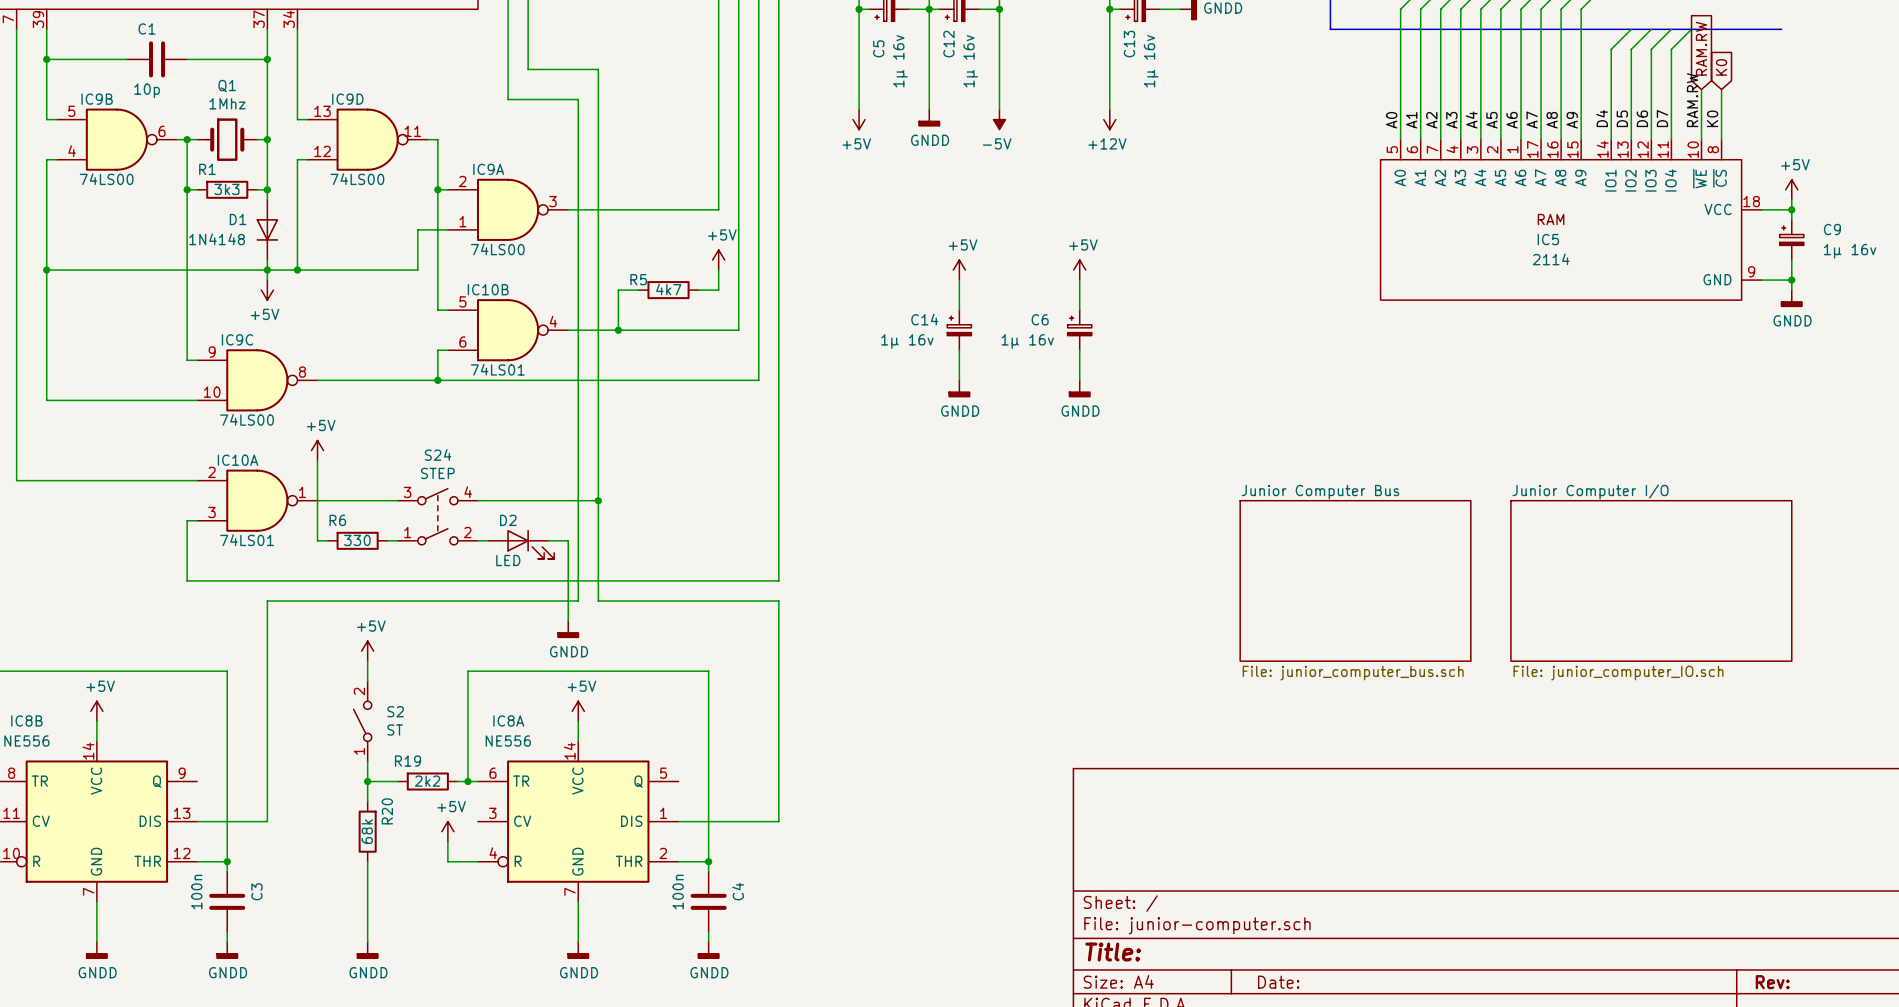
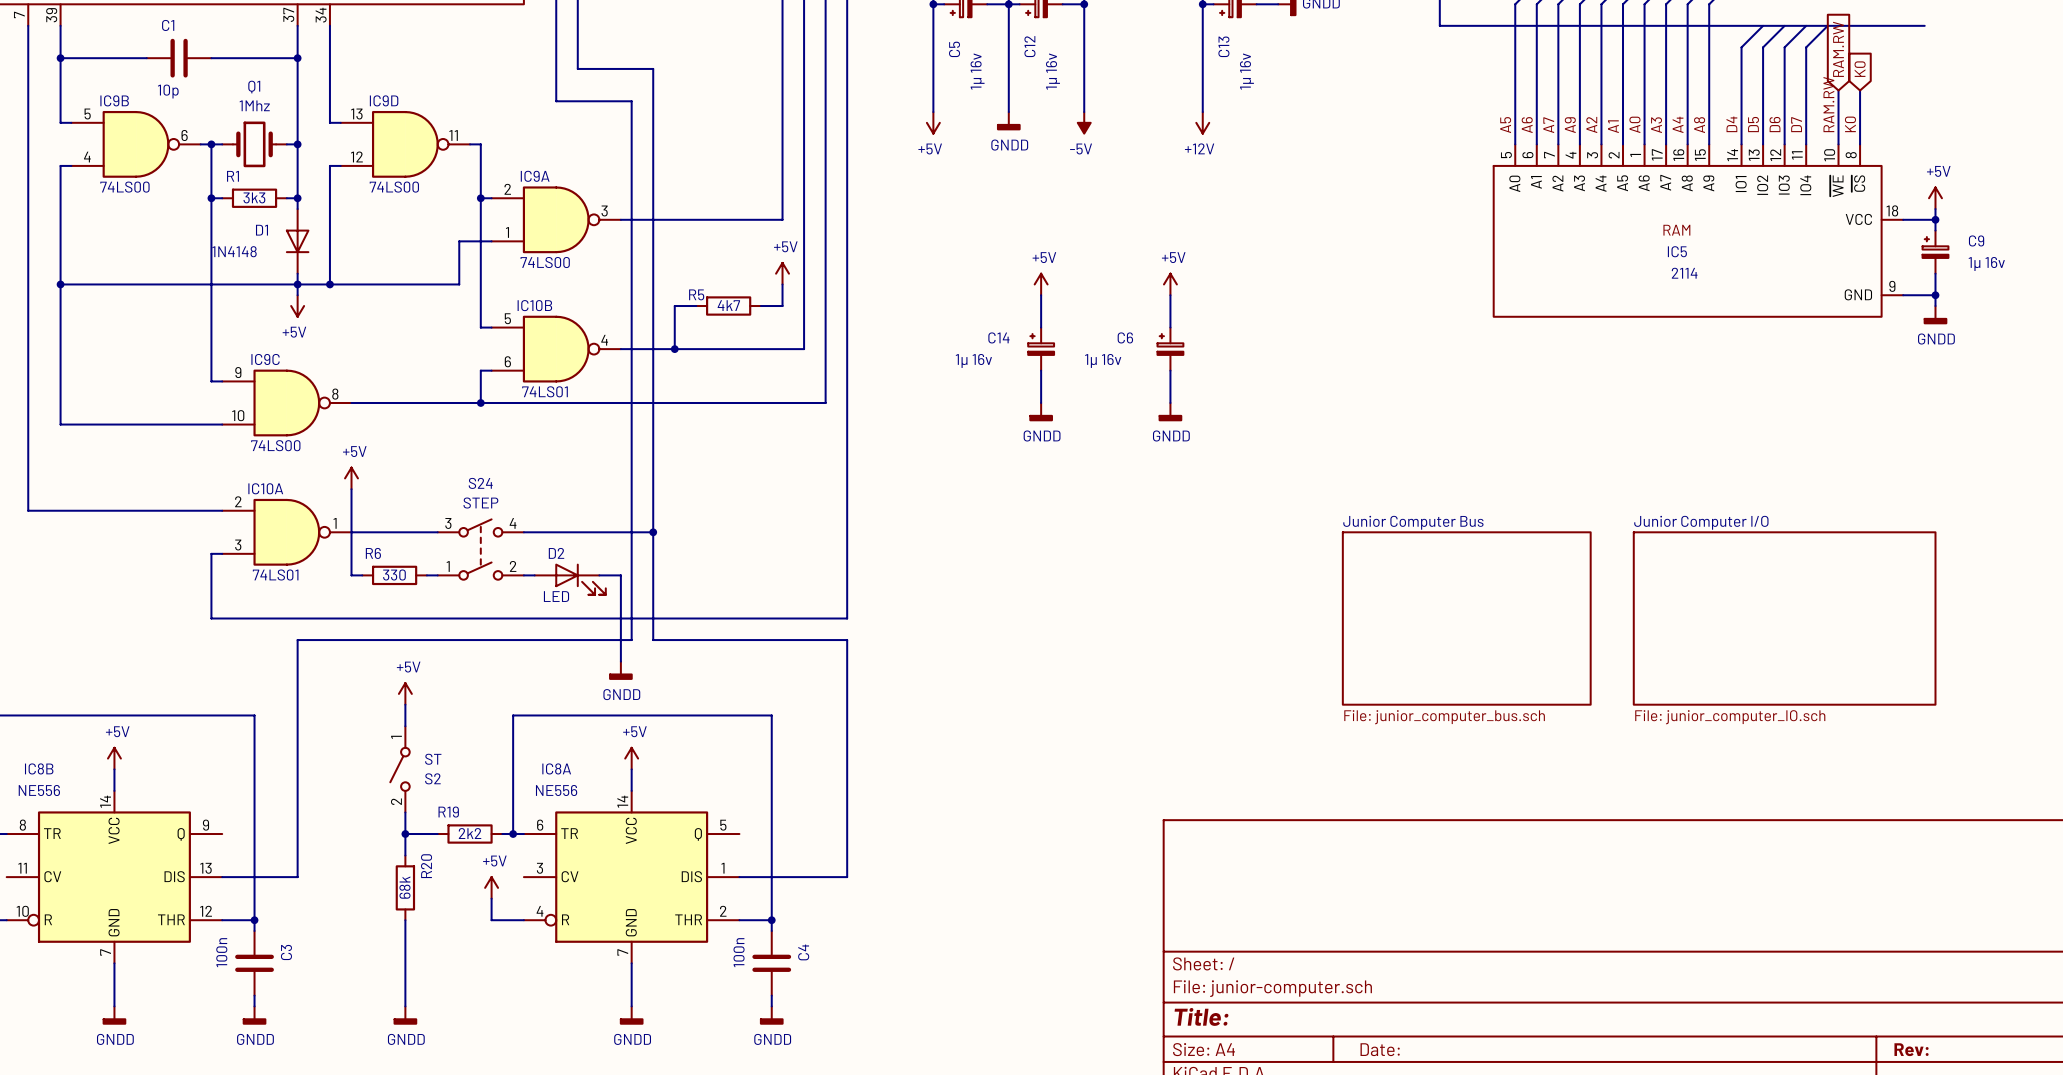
label: A0 (1391, 120) -> A5 (1505, 125)
label: A1 (1411, 120) -> A6 (1527, 125)
label: A2 (1431, 120) -> A7 (1548, 125)
label: A3 (1451, 120) -> A9 (1570, 125)
label: A4 (1471, 120) -> A2 (1591, 125)
label: A5 (1491, 120) -> A1 (1613, 126)
label: A6 (1512, 120) -> A0 (1634, 124)
label: A7 (1532, 120) -> A3 (1656, 125)
label: A8 (1552, 120) -> A4 (1678, 124)
label: A9 (1572, 120) -> A8 (1699, 125)
S2 flip: as is (362, 721) -> up-down (400, 769)

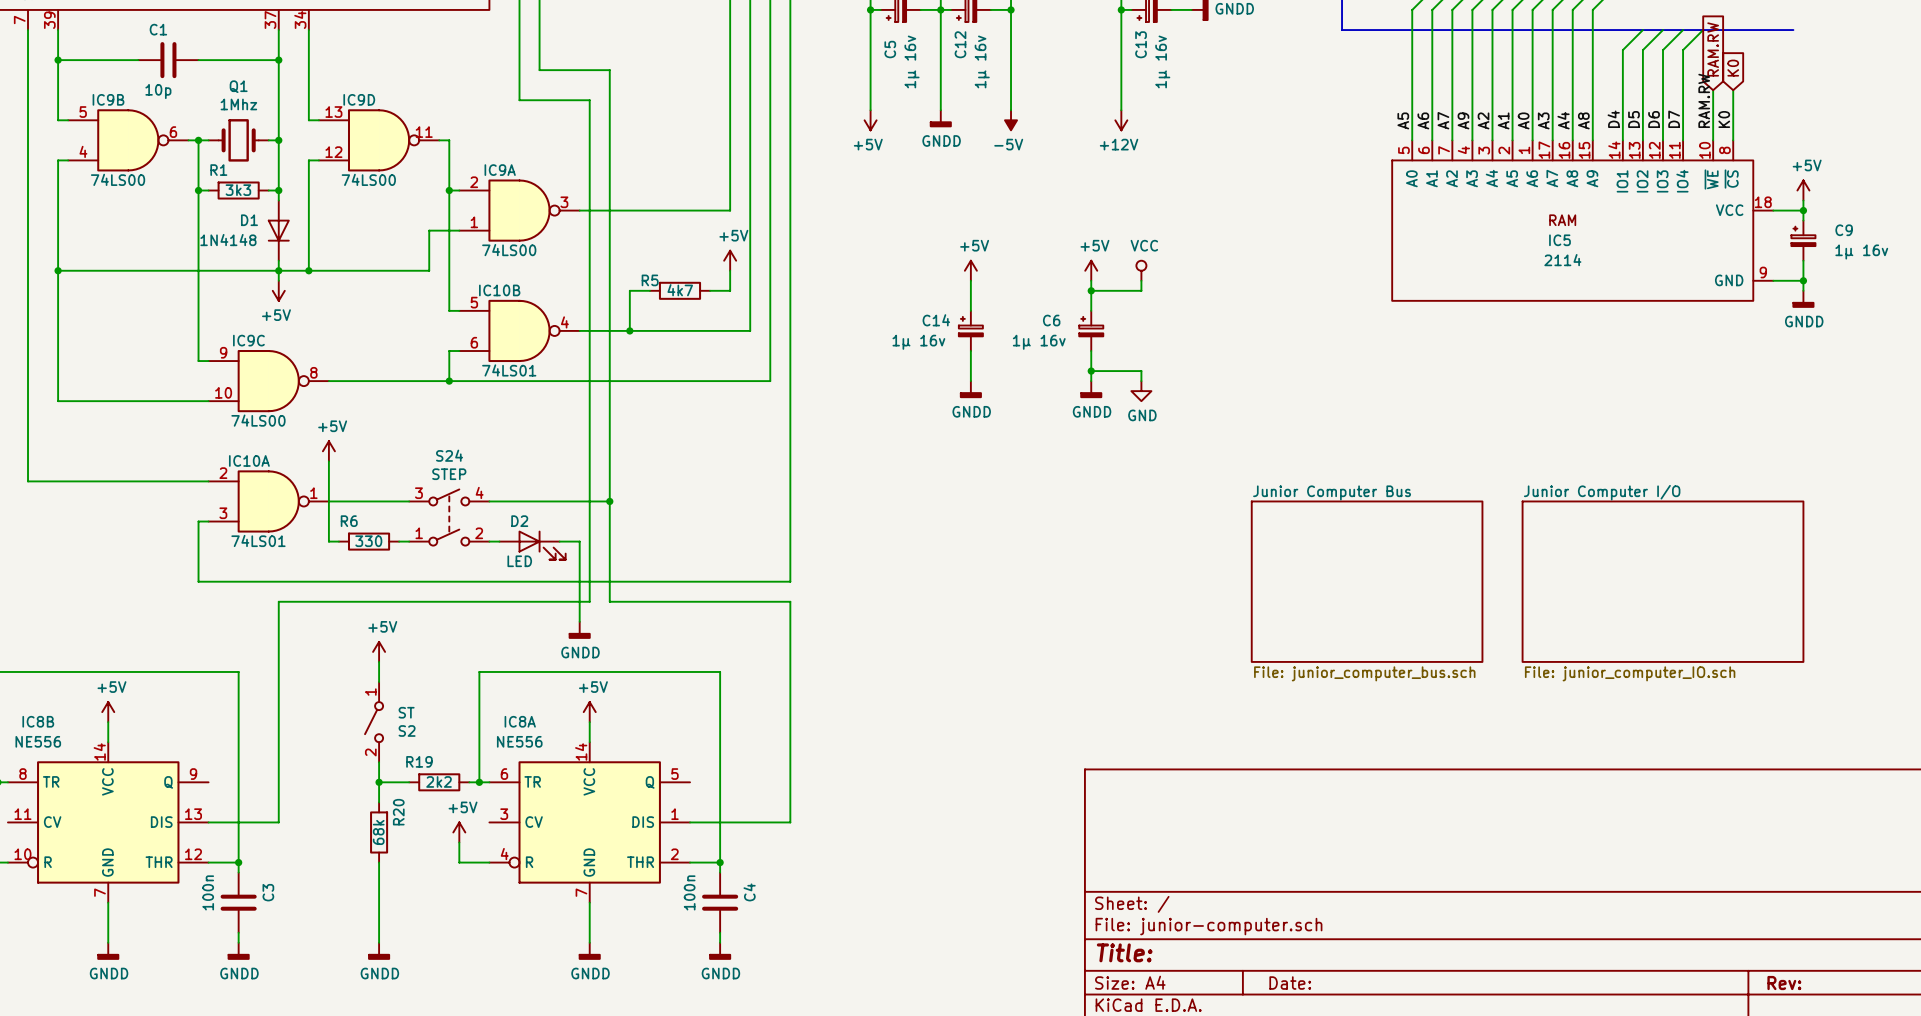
power symbol: none -> VCC (1141, 270)
wire: none -> (1141, 280) (1141, 290) (1091, 290)
junction: none -> (1091, 290)
wire: none -> (1091, 371) (1141, 371) (1141, 381)
junction: none -> (1091, 371)
power symbol: none -> GND (1141, 391)

